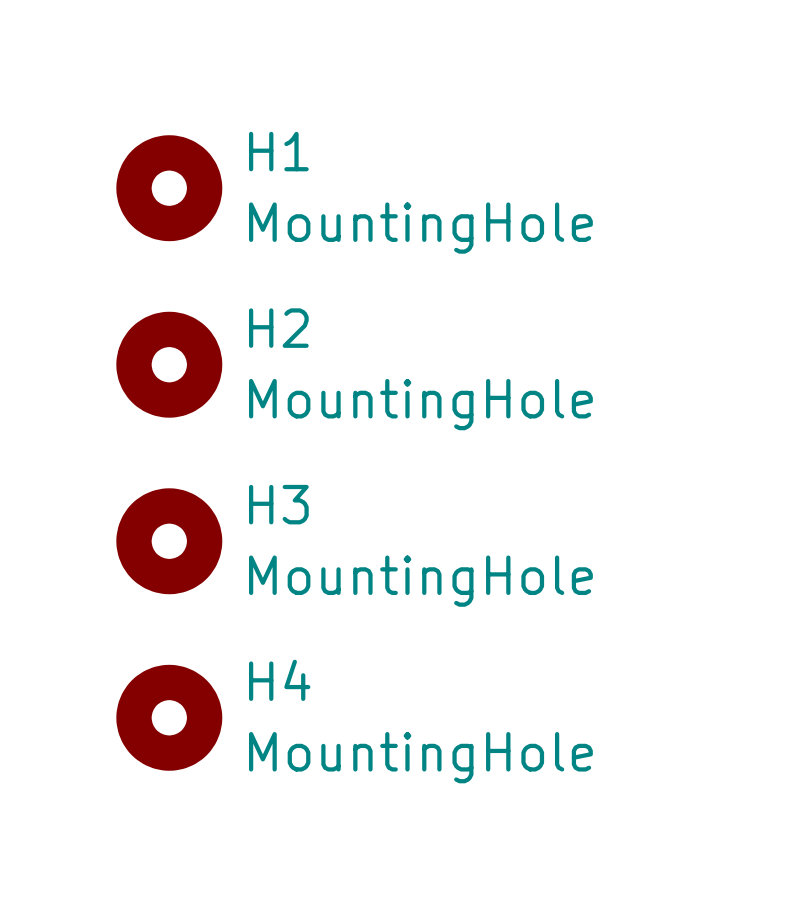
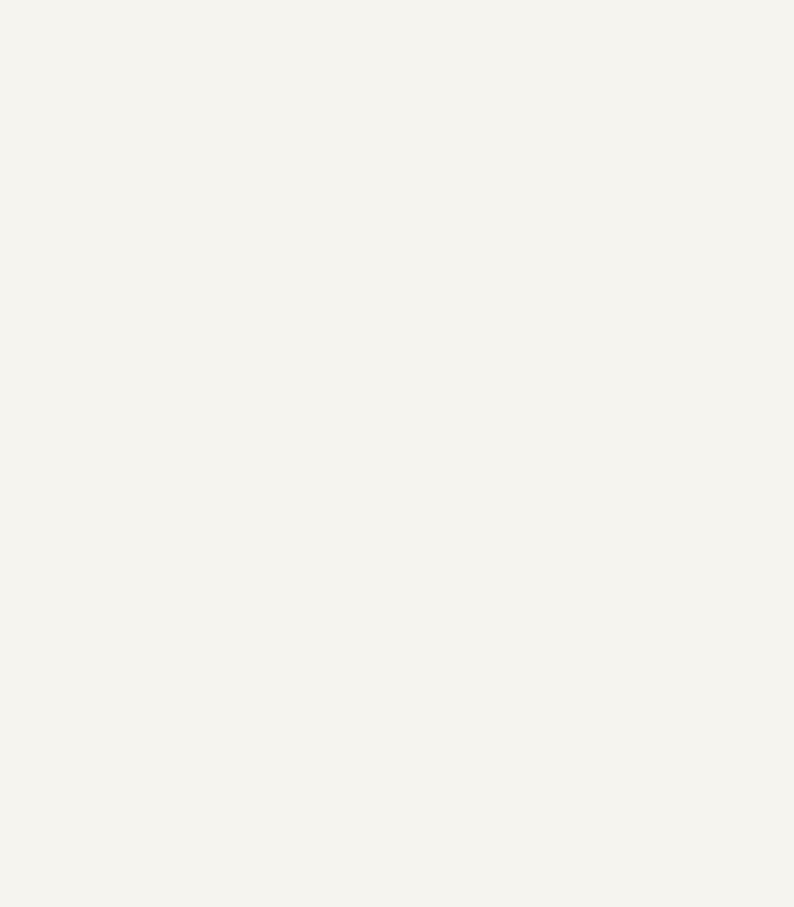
H1: MountingHole (169, 188) -> none
H2: MountingHole (169, 364) -> none
H3: MountingHole (169, 541) -> none
H4: MountingHole (169, 717) -> none

